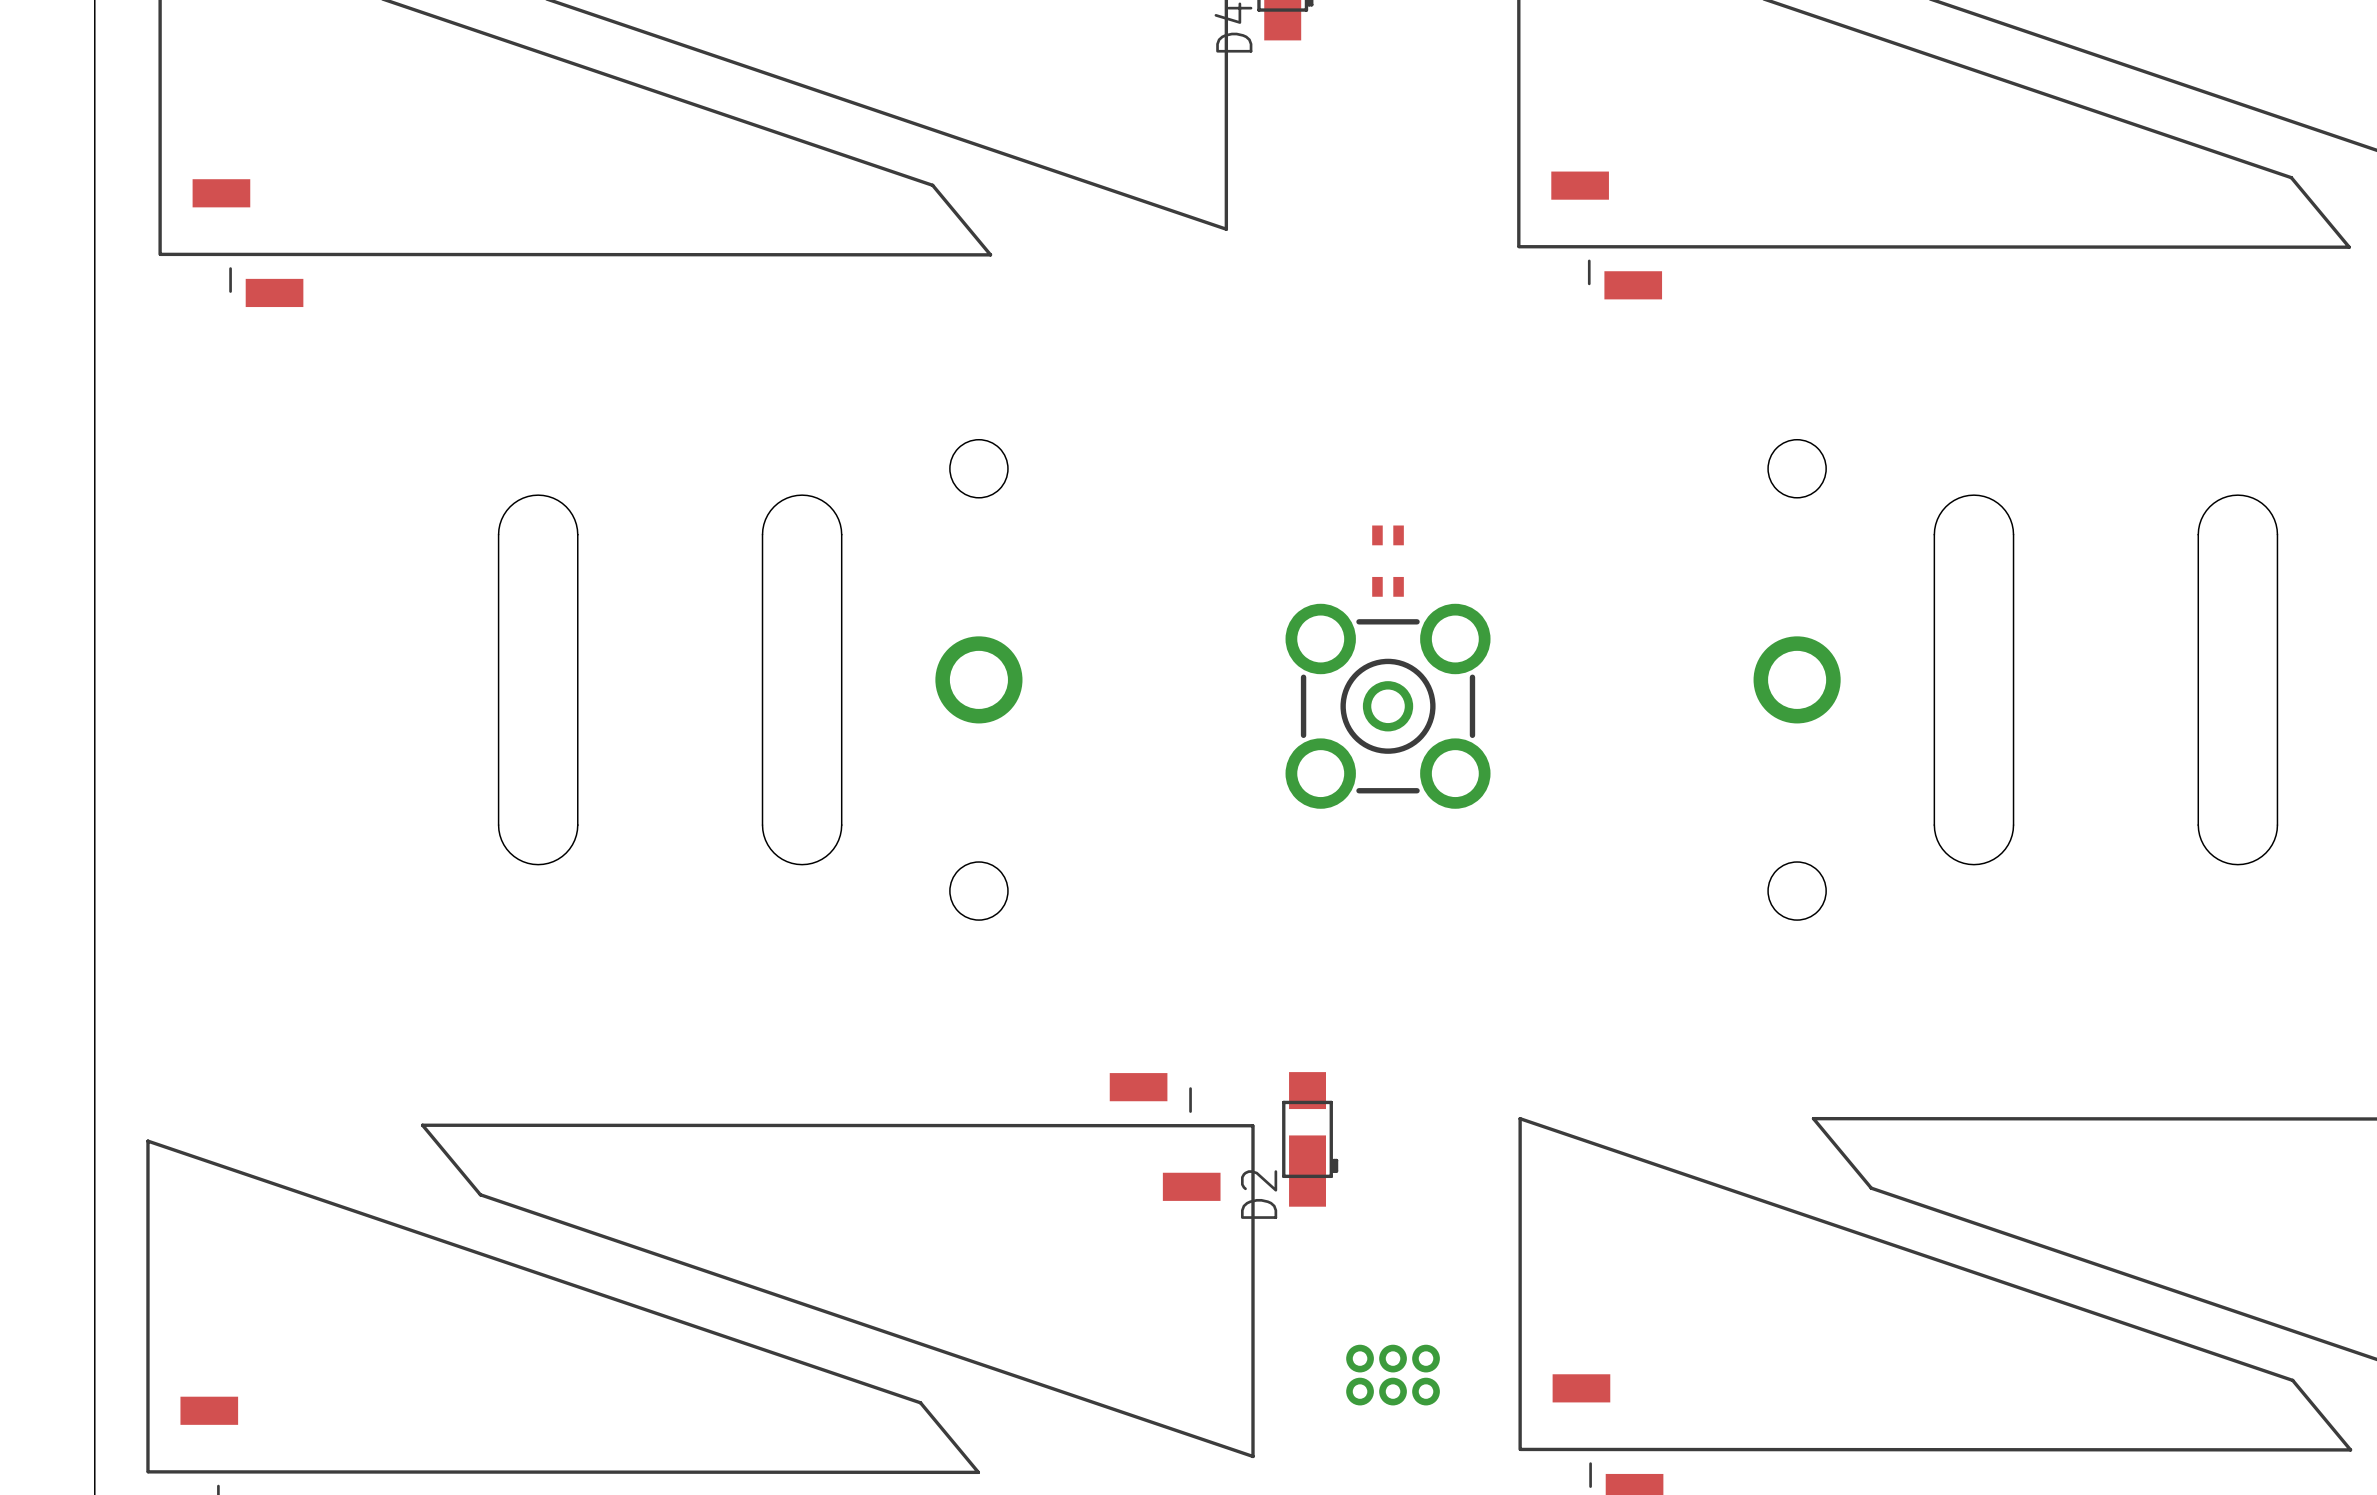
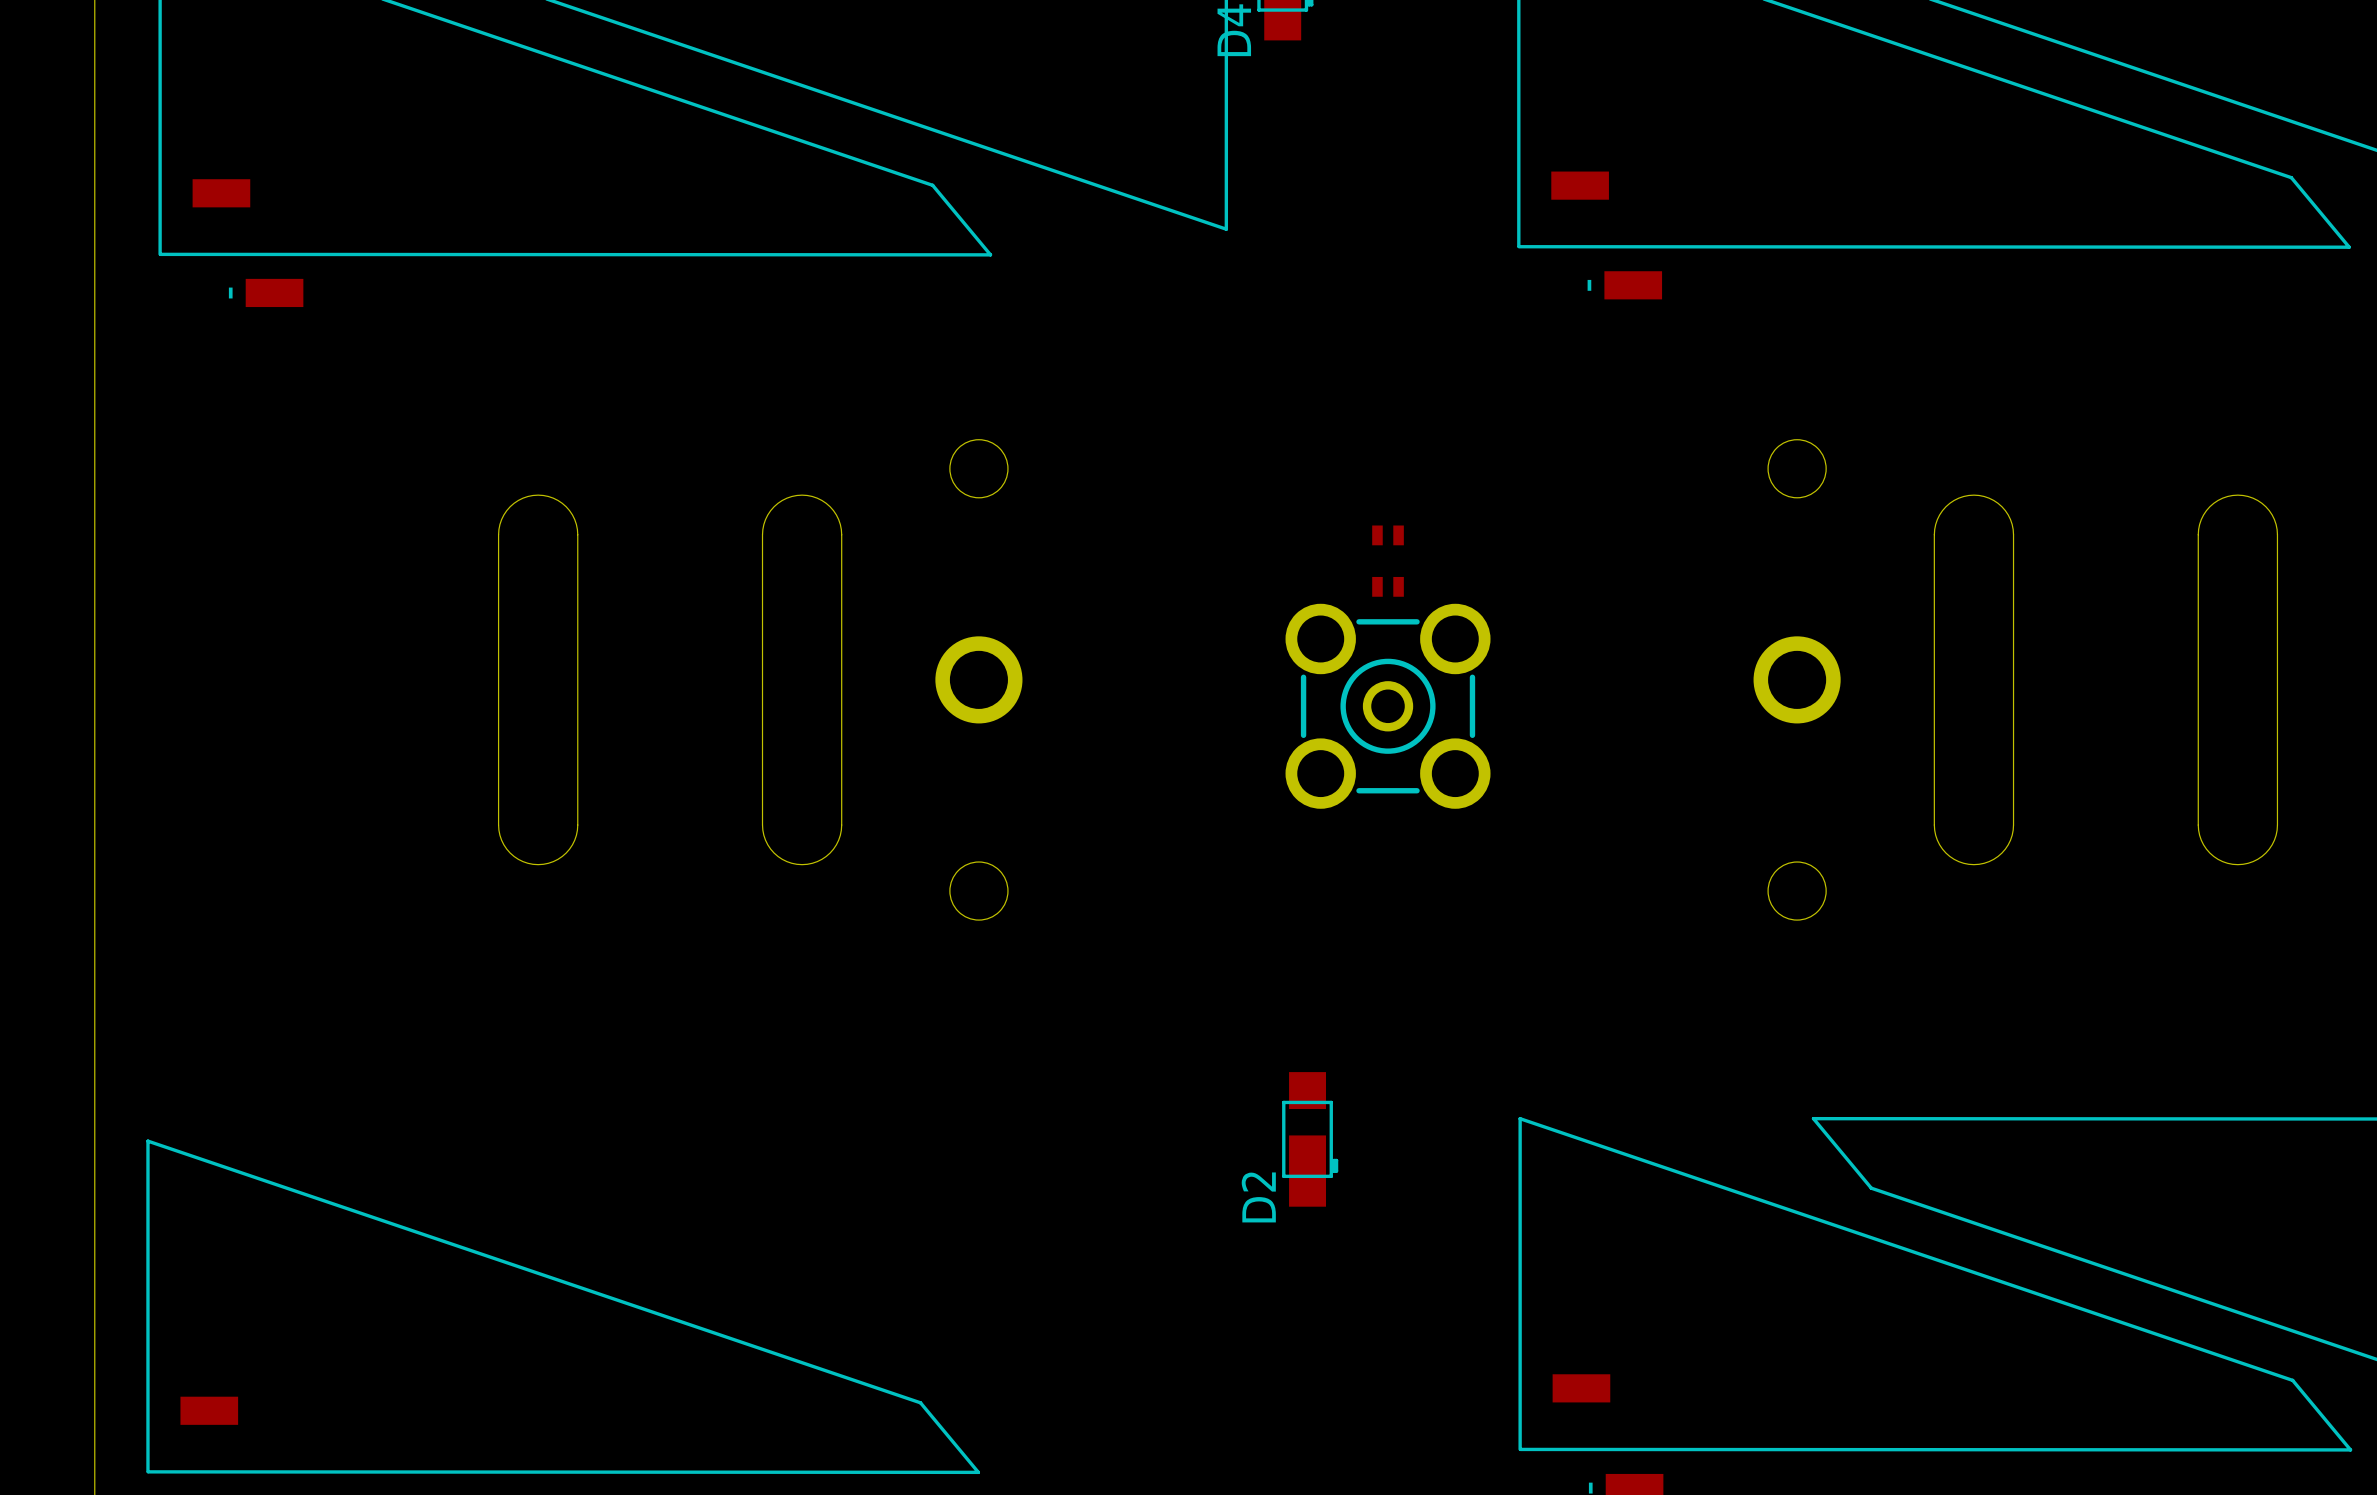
part: (837, 1265) -> none
part: (1393, 1375) -> none

